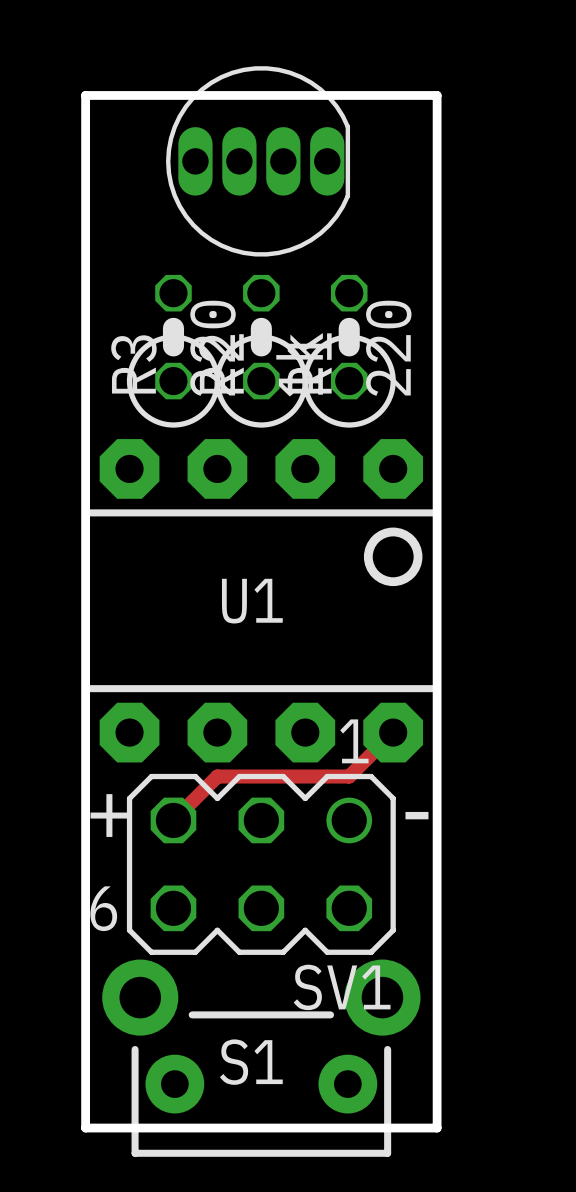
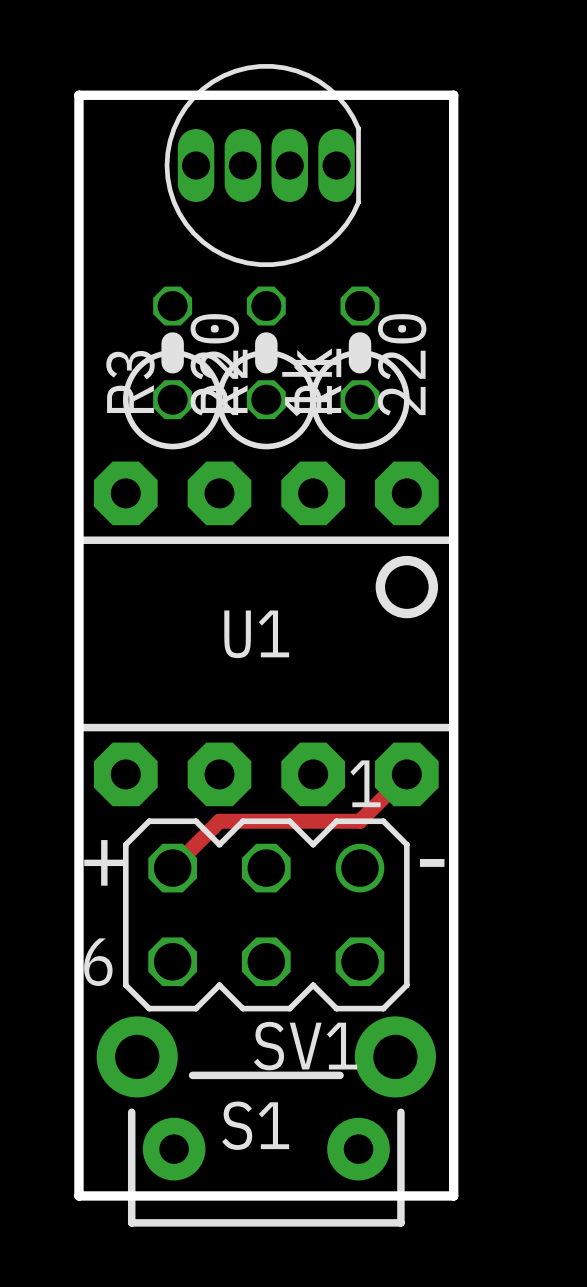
SV1 name position: SV1 (342, 987) -> SV1 (305, 1046)

